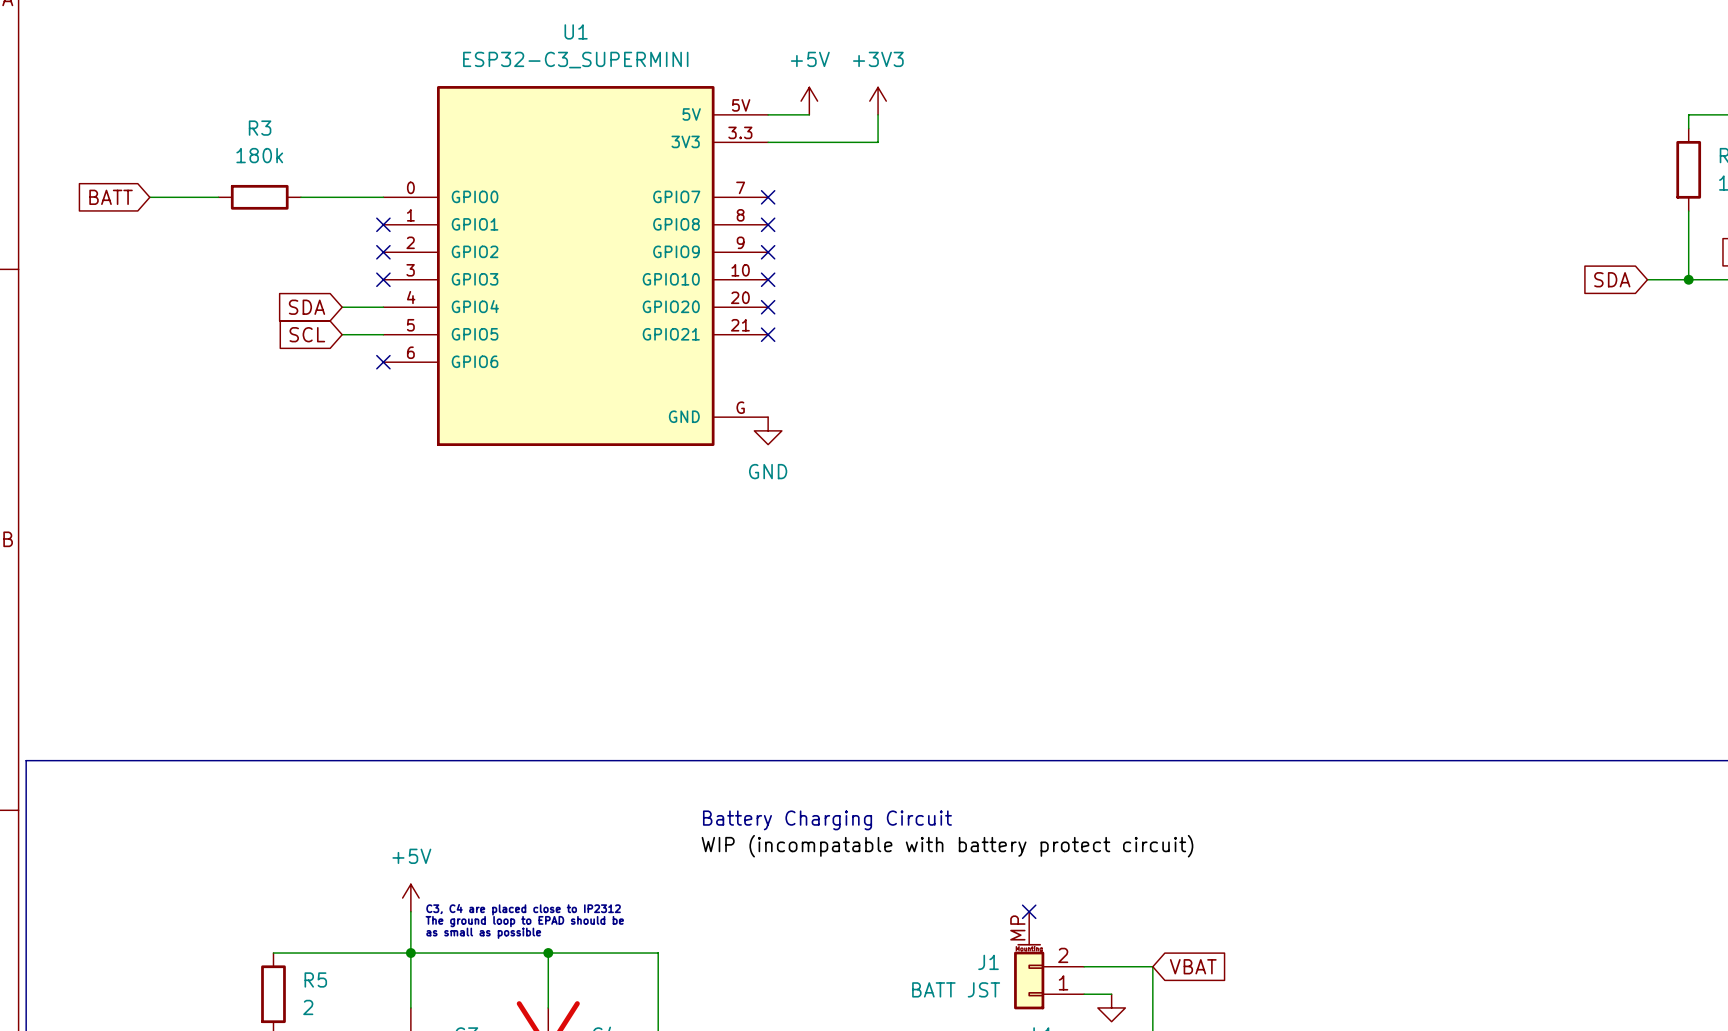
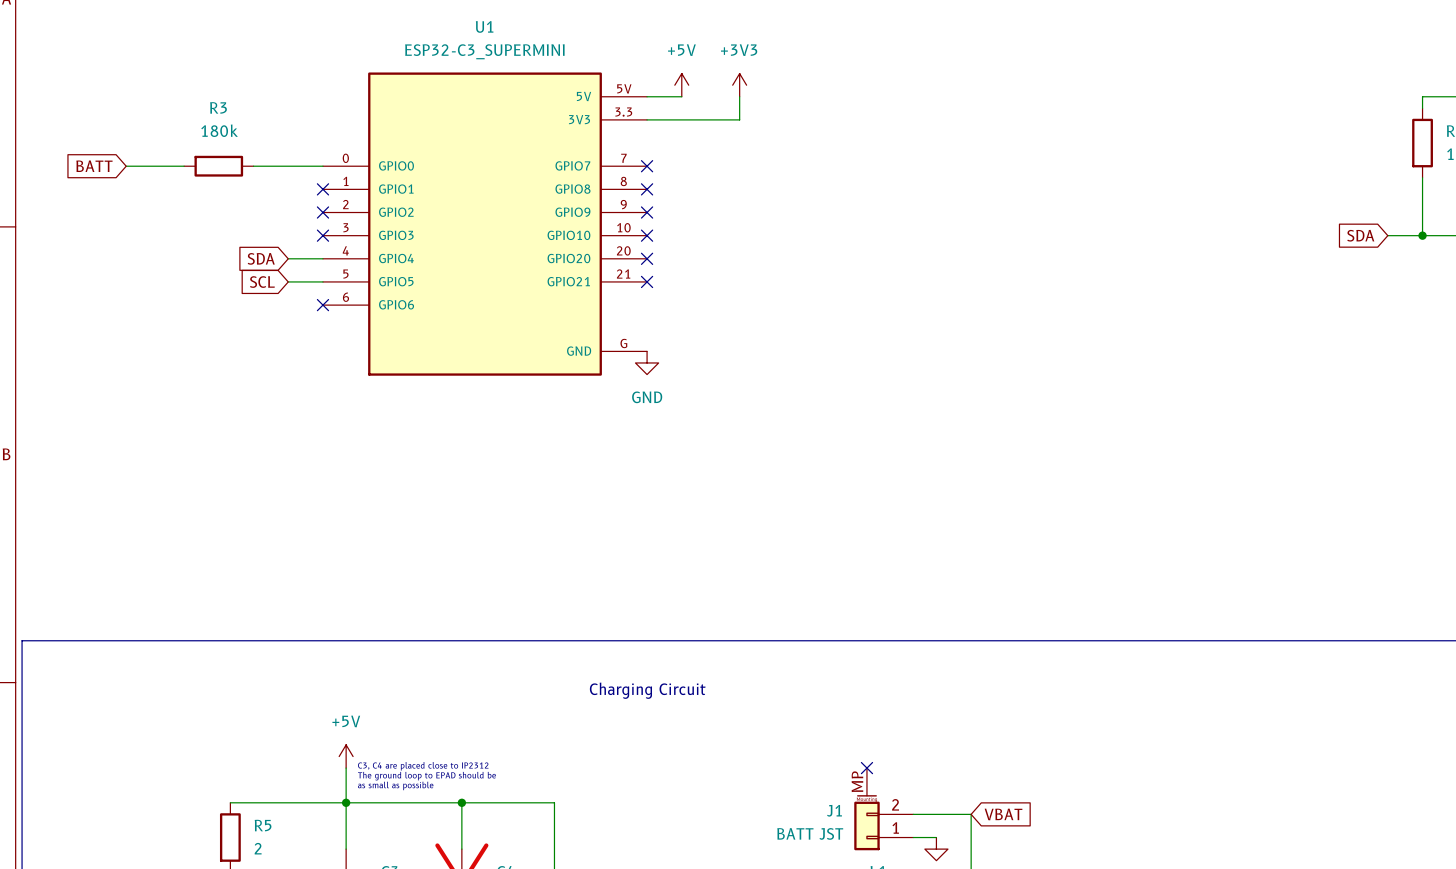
text: Battery Charging Circuit (827, 820) -> Charging Circuit (647, 690)
label: WIP (incompatable with battery protect circuit) (947, 846) -> none

